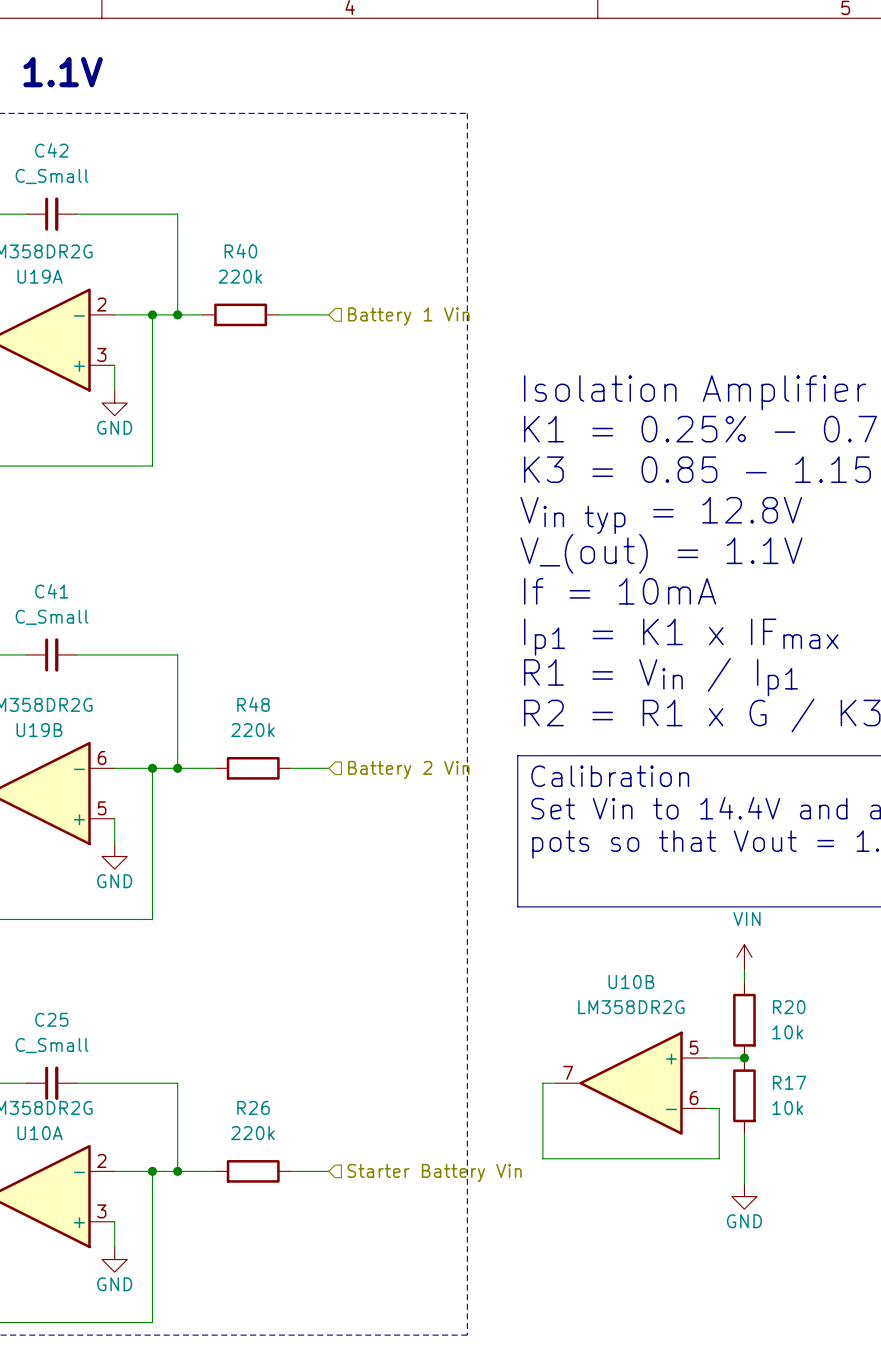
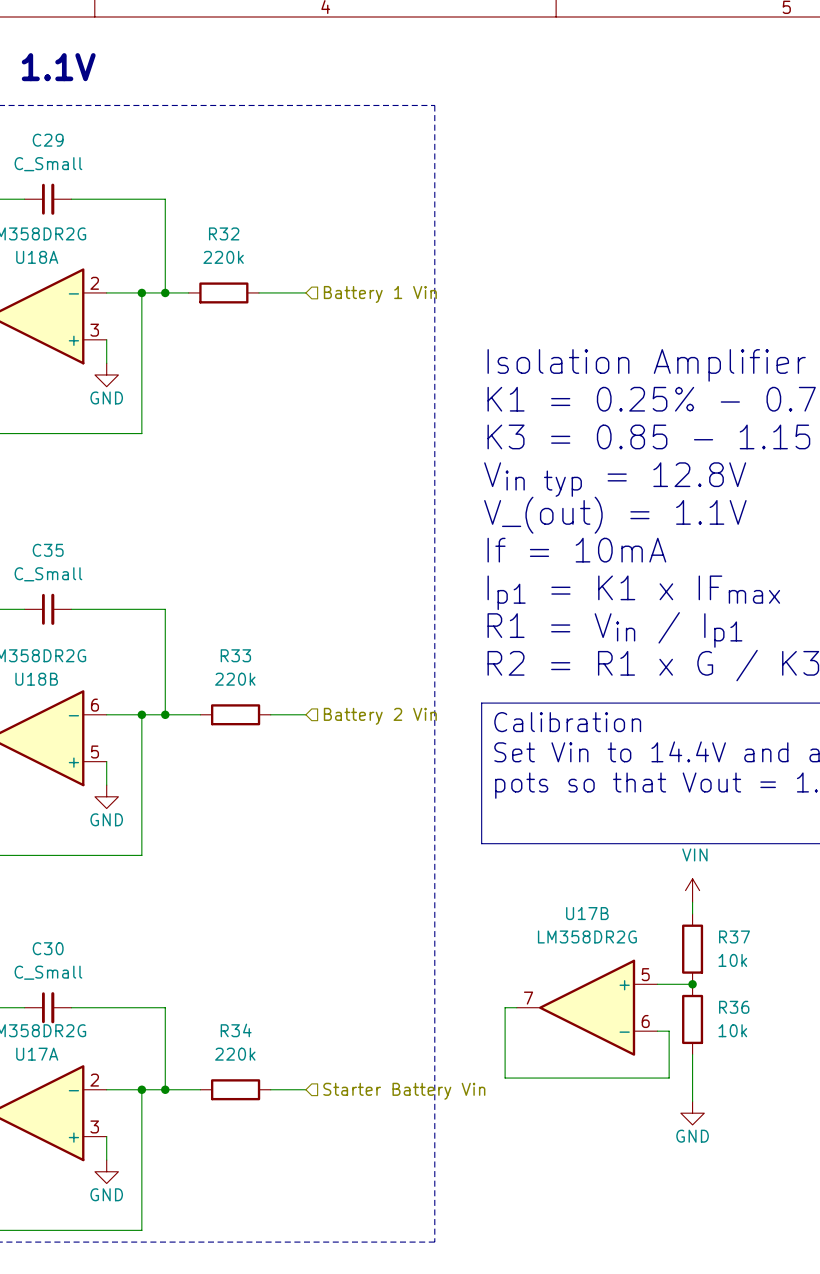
C42 name: C42 (51, 150) -> C29 (48, 140)
R40 name: R40 (240, 251) -> R32 (224, 233)
U19A name: U19A (40, 276) -> U18A (37, 257)
C41 name: C41 (51, 591) -> C35 (48, 550)
R48 name: R48 (253, 704) -> R33 (235, 655)
U19B name: U19B (39, 730) -> U18B (36, 679)
U10B name: U10B (631, 981) -> U17B (587, 913)
R20 name: R20 (789, 1007) -> R37 (734, 936)
C25 name: C25 (51, 1019) -> C30 (48, 948)
R17 name: R17 (789, 1082) -> R36 (734, 1007)
R26 name: R26 (253, 1107) -> R34 (236, 1030)
U10A name: U10A (40, 1133) -> U17A (37, 1054)

